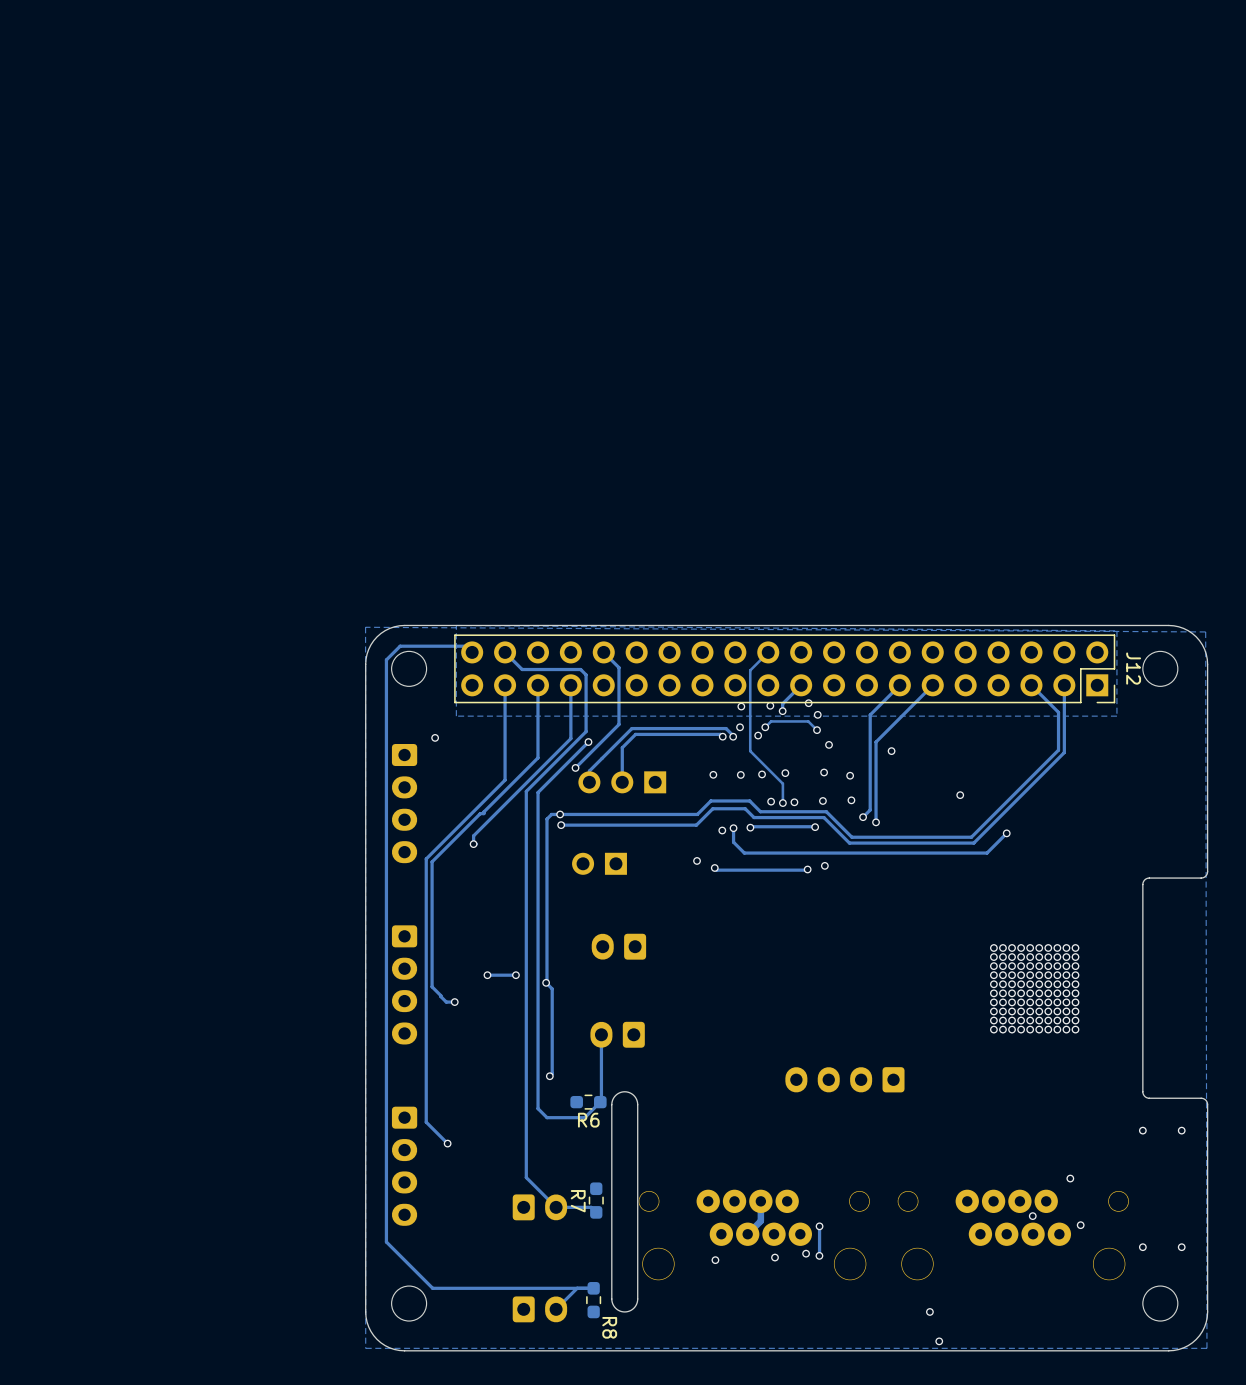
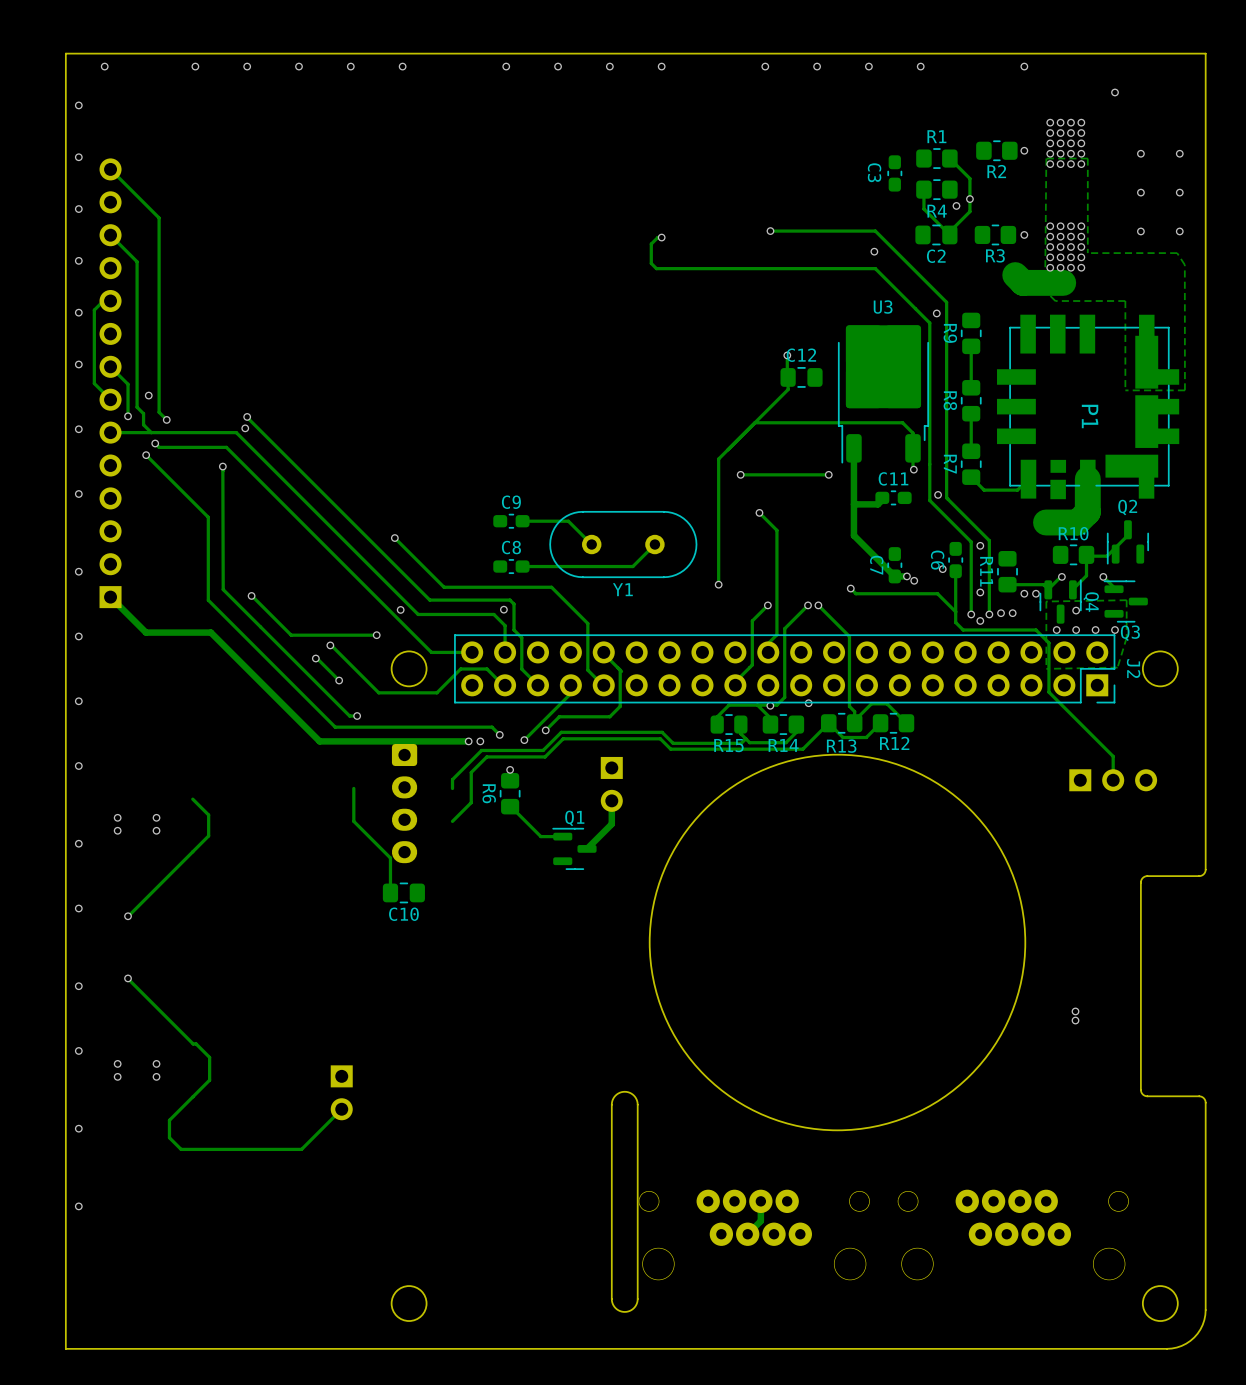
board edge: none -> (1205, 53) (1205, 870) (1200, 876) (1146, 876) (1142, 878) (1140, 882) (1141, 1091) (1146, 1096) (1200, 1096) (1205, 1101) (1205, 1310) (1202, 1324) (1194, 1337) (1181, 1345) (1166, 1348) (65, 1348) (65, 53) (1205, 53)
via: none -> (104, 66)
via: none -> (195, 66)
via: none -> (247, 66)
via: none -> (298, 66)
via: none -> (350, 66)
via: none -> (402, 66)
via: none -> (506, 66)
via: none -> (558, 66)
via: none -> (609, 66)
via: none -> (661, 66)
via: none -> (765, 66)
via: none -> (817, 66)
via: none -> (868, 66)
via: none -> (920, 66)
via: none -> (1024, 66)
via: none -> (1115, 92)
via: none -> (78, 105)
via: none -> (1050, 122)
via: none -> (1060, 122)
via: none -> (1070, 122)
via: none -> (1081, 122)
via: none -> (1050, 133)
via: none -> (1060, 133)
via: none -> (1070, 133)
via: none -> (1081, 133)
via: none -> (1050, 143)
via: none -> (1060, 143)
via: none -> (1070, 143)
via: none -> (1081, 143)
R2: none -> (996, 150)
via: none -> (1024, 150)
via: none -> (1050, 153)
via: none -> (1060, 153)
via: none -> (1070, 153)
via: none -> (1081, 153)
via: none -> (1140, 153)
via: none -> (1179, 153)
via: none -> (78, 157)
R1: none -> (936, 158)
track: none -> (949, 158) (969, 178) (969, 211) (949, 231) (946, 231) (923, 209) (923, 189)
zone outline: none -> (1087, 158) (1087, 253) (1177, 253) (1184, 264) (1184, 390) (1125, 390) (1125, 301) (1055, 301) (1045, 290) (1046, 158) (1087, 158)
via: none -> (1050, 164)
via: none -> (1060, 164)
via: none -> (1070, 164)
via: none -> (1081, 164)
track: none -> (110, 169) (159, 217) (159, 412) (166, 419)
C3: none -> (894, 173)
R4: none -> (936, 189)
via: none -> (1140, 192)
via: none -> (1179, 192)
via: none -> (969, 199)
via: none -> (956, 205)
via: none -> (78, 209)
via: none -> (1050, 226)
via: none -> (1060, 226)
via: none -> (1070, 226)
via: none -> (1081, 226)
track: none -> (770, 231) (875, 231) (946, 302) (946, 497) (989, 540) (989, 614)
via: none -> (770, 231)
via: none -> (1140, 231)
via: none -> (1179, 231)
C2: none -> (936, 234)
R3: none -> (995, 234)
via: none -> (1024, 234)
track: none -> (110, 235) (137, 261) (137, 407) (143, 413) (143, 424) (151, 432)
via: none -> (1050, 236)
via: none -> (1060, 236)
via: none -> (1070, 236)
via: none -> (1081, 236)
track: none -> (661, 237) (657, 237) (651, 244) (651, 263) (656, 268) (875, 268) (929, 323) (929, 500) (971, 541) (971, 614)
via: none -> (661, 237)
via: none -> (1050, 247)
via: none -> (1060, 247)
via: none -> (1070, 247)
via: none -> (1081, 247)
via: none -> (874, 251)
via: none -> (1050, 257)
via: none -> (1060, 257)
via: none -> (1070, 257)
via: none -> (1081, 257)
via: none -> (78, 260)
via: none -> (1050, 267)
via: none -> (1060, 267)
via: none -> (1070, 267)
via: none -> (1081, 267)
track: none -> (1018, 281) (1015, 275) (1023, 282) (1063, 282)
track: none -> (110, 301) (103, 301) (94, 310) (94, 383) (110, 399)
via: none -> (78, 312)
via: none -> (936, 313)
R9: none -> (971, 333)
track: none -> (971, 346) (971, 387)
track: none -> (787, 355) (788, 389) (718, 459) (718, 584)
via: none -> (787, 355)
via: none -> (78, 364)
track: none -> (110, 366) (128, 384) (128, 416)
C12: none -> (801, 377)
part: none -> (110, 383)
U3: none -> (883, 394)
via: none -> (148, 395)
P1: none -> (1088, 406)
track: none -> (971, 413) (971, 451)
via: none -> (128, 416)
via: none -> (247, 416)
via: none -> (166, 419)
track: none -> (754, 422) (902, 422) (912, 433) (913, 469)
via: none -> (245, 428)
via: none -> (78, 429)
track: none -> (110, 432) (236, 432) (418, 614) (493, 614) (505, 625) (505, 652)
via: none -> (155, 443)
track: none -> (853, 448) (853, 535) (894, 576) (906, 576)
track: none -> (146, 455) (208, 517) (208, 600) (335, 727) (491, 727) (499, 734)
via: none -> (146, 455)
via: none -> (222, 466)
via: none -> (913, 469)
track: none -> (223, 470) (222, 466) (223, 589) (349, 716) (357, 716)
via: none -> (740, 474)
track: none -> (828, 474) (740, 474)
via: none -> (828, 474)
track: none -> (971, 477) (984, 490) (1017, 490) (1028, 479)
track: none -> (1087, 479) (1087, 512) (1077, 522) (1046, 522)
via: none -> (78, 494)
via: none -> (938, 494)
track: none -> (884, 497) (877, 504) (853, 504)
C11: none -> (893, 497)
track: none -> (759, 512) (776, 530) (776, 634) (769, 642)
via: none -> (759, 512)
C9: none -> (511, 521)
track: none -> (522, 521) (568, 521) (591, 544)
track: none -> (1126, 524) (1126, 536) (1107, 556) (1086, 556) (1086, 575) (1072, 589)
track: none -> (394, 538) (444, 587) (551, 587) (587, 623) (587, 670) (602, 685)
via: none -> (394, 538)
Q2: none -> (1127, 542)
Y1: none -> (623, 544)
track: none -> (654, 544) (632, 566) (522, 566)
via: none -> (980, 545)
R10: none -> (1073, 554)
C6: none -> (955, 560)
C7: none -> (894, 565)
C8: none -> (511, 566)
via: none -> (942, 569)
via: none -> (78, 571)
track: none -> (955, 571) (955, 622) (963, 630) (1035, 630) (1048, 642) (1048, 692) (1113, 756) (1113, 780)
R11: none -> (1007, 571)
via: none -> (906, 576)
track: none -> (1061, 576) (1048, 589) (1043, 584) (1007, 584)
via: none -> (1061, 576)
track: none -> (1103, 576) (1114, 587)
via: none -> (1103, 576)
via: none -> (914, 580)
via: none -> (718, 584)
track: none -> (850, 588) (855, 593) (937, 593) (955, 611)
via: none -> (850, 588)
via: none -> (980, 592)
via: none -> (1024, 593)
via: none -> (1035, 593)
track: none -> (251, 595) (291, 635) (376, 635)
via: none -> (251, 595)
track: none -> (110, 597) (146, 632) (210, 632) (319, 741) (468, 741)
zone outline: none -> (1126, 600) (1126, 637) (1117, 667) (1046, 668) (1046, 601) (1126, 600)
Q4: none -> (1060, 601)
Q3: none -> (1125, 601)
track: none -> (767, 605) (752, 620) (752, 664) (735, 681)
via: none -> (767, 605)
track: none -> (808, 605) (784, 628) (784, 697) (776, 705) (729, 705) (717, 716) (717, 724)
via: none -> (808, 605)
track: none -> (818, 605) (849, 636) (849, 706) (854, 711) (854, 723)
via: none -> (818, 605)
via: none -> (400, 609)
via: none -> (503, 609)
via: none -> (1076, 610)
via: none -> (1001, 613)
via: none -> (1012, 613)
via: none -> (971, 614)
via: none -> (989, 614)
via: none -> (980, 620)
zone outline: (456, 625) (456, 716) (1116, 716) (1116, 630) (456, 625) -> none
board edge: (1168, 625) (404, 625) (389, 628) (377, 636) (368, 649) (365, 664) (365, 1311) (368, 1326) (377, 1339) (389, 1347) (404, 1350) (1168, 1350) (1183, 1347) (1196, 1339) (1204, 1326) (1207, 1311) (1207, 1103) (1201, 1098) (1148, 1098) (1144, 1095) (1142, 1091) (1143, 882) (1148, 878) (1201, 877) (1205, 876) (1207, 871) (1207, 659) (1202, 644) (1196, 636) (1183, 628) (1168, 625) -> none
zone outline: (365, 627) (1205, 631) (1206, 1348) (365, 1348) (365, 627) -> none
via: none -> (1056, 630)
via: none -> (1076, 630)
via: none -> (1095, 630)
via: none -> (1115, 630)
via: none -> (376, 635)
via: none -> (78, 636)
track: none -> (330, 645) (378, 692) (436, 692) (460, 668) (486, 668) (503, 685)
via: none -> (330, 645)
track: (472, 652) (465, 646) (400, 646) (386, 659) (386, 1242) (432, 1288) (593, 1288) -> (472, 652) (431, 652) (226, 447) (159, 447) (155, 443)
track: (505, 652) (521, 669) -> (247, 416) (429, 600) (509, 600) (514, 604) (514, 630) (521, 637) (521, 669)
track: (603, 652) (618, 667) (618, 724) (575, 767) -> (603, 652) (621, 671)
track: (768, 652) (750, 670) (750, 751) (782, 783) (782, 803) -> none
via: none -> (315, 658)
track: none -> (317, 658) (315, 657) (339, 680)
J12 name: J12 (1133, 668) -> J2 (1133, 668)
track: (522, 669) (580, 669) (586, 674) (586, 731) (526, 791) (526, 1177) (556, 1207) (591, 1207) (596, 1212) -> none
track: none -> (620, 670) (620, 706) (609, 716) (559, 716) (545, 730)
via: none -> (339, 680)
track: (505, 685) (505, 780) (426, 858) (426, 1122) (447, 1143) -> none
track: (537, 685) (537, 757) (483, 813) (480, 813) (432, 861) (432, 986) (446, 1002) (456, 1002) -> (537, 685) (522, 669)
track: (801, 685) (782, 703) (782, 711) -> none
track: (899, 685) (870, 714) (870, 810) (863, 817) -> none
track: (932, 685) (876, 742) (876, 822) -> none
track: (1031, 685) (1058, 712) (1058, 750) (971, 837) (851, 837) (826, 811) (760, 811) (749, 800) (710, 800) (697, 814) (551, 814) (546, 819) (546, 982) -> none
track: (1064, 685) (1064, 752) (973, 843) (849, 843) (823, 817) (754, 817) (745, 808) (712, 808) (696, 825) (561, 825) -> none
track: (570, 693) (570, 738) (473, 835) (473, 844) (476, 844) -> (570, 693) (524, 740)
via: none -> (78, 701)
track: none -> (757, 705) (770, 718) (770, 724)
via: (741, 706) -> none
via: (782, 711) -> none
via: (817, 714) -> none
via: none -> (357, 716)
track: none -> (854, 720) (871, 703) (887, 703) (906, 723)
R13: none -> (841, 723)
track: none -> (880, 723) (866, 737) (843, 737) (828, 723) (802, 749) (670, 749) (660, 738) (563, 738) (545, 756) (486, 756) (471, 772) (471, 802) (452, 821)
R12: none -> (893, 723)
R15: none -> (729, 724)
R14: none -> (783, 724)
track: none -> (796, 724) (796, 732) (786, 742) (749, 742) (740, 733) (740, 724)
via: (740, 727) -> none
track: (765, 727) (771, 721) (808, 721) (817, 730) -> none
via: (765, 727) -> none
via: none -> (545, 730)
via: (817, 730) -> none
via: none -> (499, 734)
via: (758, 735) -> none
track: (722, 736) (720, 734) (635, 734) (622, 747) (622, 782) -> none
via: (722, 736) -> none
track: (733, 736) (726, 728) (631, 728) (589, 771) (589, 782) -> none
via: (733, 736) -> none
via: (435, 737) -> none
track: none -> (745, 738) (741, 743) (673, 743) (662, 732) (561, 732) (543, 750) (481, 750) (452, 779) (452, 788)
via: none -> (524, 740)
via: none -> (468, 741)
via: none -> (480, 741)
track: (588, 742) (538, 792) (538, 1108) (547, 1117) (584, 1117) (601, 1100) (601, 1034) -> none
via: (588, 742) -> none
via: (829, 744) -> none
via: (891, 751) -> none
round board edge: none -> [649, 754, 1026, 1131]
via: none -> (78, 766)
via: (575, 767) -> none
via: none -> (510, 769)
part footprint: [578, 771, 667, 794] -> [600, 756, 623, 812]
via: (824, 772) -> none
via: (785, 773) -> none
via: (713, 774) -> none
via: (740, 774) -> none
via: (762, 774) -> none
via: (850, 775) -> none
part: none -> (1113, 780)
track: none -> (353, 788) (353, 821) (390, 858) (390, 892)
via: (960, 795) -> none
track: none -> (192, 799) (208, 815) (208, 835) (128, 916)
track: none -> (611, 800) (611, 824) (587, 848)
via: (822, 800) -> none
via: (851, 800) -> none
via: (771, 801) -> none
via: (794, 802) -> none
via: (782, 803) -> none
track: none -> (510, 805) (540, 836) (562, 836)
via: (560, 814) -> none
via: none -> (117, 817)
via: none -> (156, 817)
via: (863, 817) -> none
via: (876, 822) -> none
via: (561, 825) -> none
track: (749, 826) (748, 827) (750, 827) (750, 825) (815, 827) -> none
via: (750, 827) -> none
via: (815, 827) -> none
track: (733, 828) (733, 842) (744, 853) (987, 853) (1006, 833) -> none
via: (733, 828) -> none
via: none -> (117, 830)
via: none -> (156, 830)
via: (722, 830) -> none
via: (1006, 833) -> none
via: none -> (78, 843)
via: (473, 844) -> none
Q1: none -> (574, 848)
via: (697, 860) -> none
part: (599, 863) -> none
via: (824, 865) -> none
track: (714, 867) (716, 870) (807, 869) -> none
via: (714, 867) -> none
via: (807, 869) -> none
C10: none -> (403, 892)
via: none -> (78, 908)
via: none -> (128, 916)
part: (618, 946) -> none
via: (993, 947) -> none
via: (1002, 947) -> none
via: (1012, 947) -> none
via: (1021, 947) -> none
via: (1030, 947) -> none
via: (1039, 947) -> none
via: (1048, 947) -> none
via: (1057, 947) -> none
via: (1066, 947) -> none
via: (1075, 947) -> none
via: (993, 957) -> none
via: (1002, 957) -> none
via: (1012, 957) -> none
via: (1021, 957) -> none
via: (1030, 957) -> none
via: (1039, 957) -> none
via: (1048, 957) -> none
via: (1057, 957) -> none
via: (1066, 957) -> none
via: (1075, 957) -> none
via: (993, 966) -> none
via: (1002, 966) -> none
via: (1012, 966) -> none
via: (1021, 966) -> none
via: (1030, 966) -> none
via: (1039, 966) -> none
via: (1048, 966) -> none
via: (1057, 966) -> none
via: (1066, 966) -> none
via: (1075, 966) -> none
via: (487, 975) -> none
track: (515, 975) (487, 975) -> none
via: (515, 975) -> none
via: (993, 975) -> none
via: (1002, 975) -> none
via: (1012, 975) -> none
via: (1021, 975) -> none
via: (1030, 975) -> none
via: (1039, 975) -> none
via: (1048, 975) -> none
via: (1057, 975) -> none
via: (1066, 975) -> none
via: (1075, 975) -> none
track: none -> (128, 978) (193, 1043) (196, 1043) (209, 1057) (209, 1080) (169, 1120) (169, 1137) (181, 1149) (301, 1149) (341, 1109)
via: none -> (128, 978)
track: (546, 982) (552, 988) (552, 1073) (549, 1076) -> none
via: (546, 982) -> none
part: (404, 984) -> none
via: (993, 984) -> none
via: (1002, 984) -> none
via: (1012, 984) -> none
via: (1021, 984) -> none
via: (1030, 984) -> none
via: (1039, 984) -> none
via: (1048, 984) -> none
via: (1057, 984) -> none
via: (1066, 984) -> none
via: (1075, 984) -> none
via: none -> (78, 986)
via: (993, 993) -> none
via: (1002, 993) -> none
via: (1012, 993) -> none
via: (1021, 993) -> none
via: (1030, 993) -> none
via: (1039, 993) -> none
via: (1048, 993) -> none
via: (1057, 993) -> none
via: (1066, 993) -> none
via: (1075, 993) -> none
via: (454, 1002) -> none
via: (993, 1002) -> none
via: (1002, 1002) -> none
via: (1012, 1002) -> none
via: (1021, 1002) -> none
via: (1030, 1002) -> none
via: (1039, 1002) -> none
via: (1048, 1002) -> none
via: (1057, 1002) -> none
via: (1066, 1002) -> none
via: (1075, 1002) -> none
via: (993, 1011) -> none
via: (1002, 1011) -> none
via: (1012, 1011) -> none
via: (1021, 1011) -> none
via: (1030, 1011) -> none
via: (1039, 1011) -> none
via: (1048, 1011) -> none
via: (1057, 1011) -> none
via: (1066, 1011) -> none
via: (993, 1020) -> none
via: (1002, 1020) -> none
via: (1012, 1020) -> none
via: (1021, 1020) -> none
via: (1030, 1020) -> none
via: (1039, 1020) -> none
via: (1048, 1020) -> none
via: (1057, 1020) -> none
via: (1066, 1020) -> none
via: (993, 1029) -> none
via: (1002, 1029) -> none
via: (1012, 1029) -> none
via: (1021, 1029) -> none
via: (1030, 1029) -> none
via: (1039, 1029) -> none
via: (1048, 1029) -> none
via: (1057, 1029) -> none
via: (1066, 1029) -> none
via: (1075, 1029) -> none
part: (617, 1034) -> none
via: none -> (78, 1050)
via: none -> (117, 1063)
via: none -> (156, 1063)
via: none -> (117, 1076)
via: none -> (156, 1076)
via: (549, 1076) -> none
part: (844, 1079) -> none
part: none -> (341, 1092)
R6 footprint: [570, 1094, 607, 1110] -> [499, 772, 521, 815]
R6 name position: R6 (588, 1120) -> R6 (489, 793)
via: none -> (78, 1128)
via: (1142, 1130) -> none
via: (1181, 1130) -> none
via: (447, 1143) -> none
part: (404, 1166) -> none
via: (1070, 1178) -> none
R7 footprint: [588, 1182, 604, 1219] -> [960, 443, 982, 485]
via: none -> (78, 1206)
part: (539, 1207) -> none
via: (1032, 1216) -> none
via: (1080, 1225) -> none
track: (819, 1226) (819, 1255) -> none
via: (819, 1226) -> none
via: (1142, 1247) -> none
via: (1181, 1247) -> none
via: (806, 1253) -> none
via: (819, 1255) -> none
via: (775, 1257) -> none
via: (715, 1260) -> none
R8 footprint: [586, 1282, 602, 1319] -> [960, 380, 982, 422]
track: (577, 1288) (556, 1309) -> none
part: (539, 1309) -> none
via: (929, 1311) -> none
R8 name position: R8 (609, 1327) -> R8 (950, 400)
via: (939, 1341) -> none

